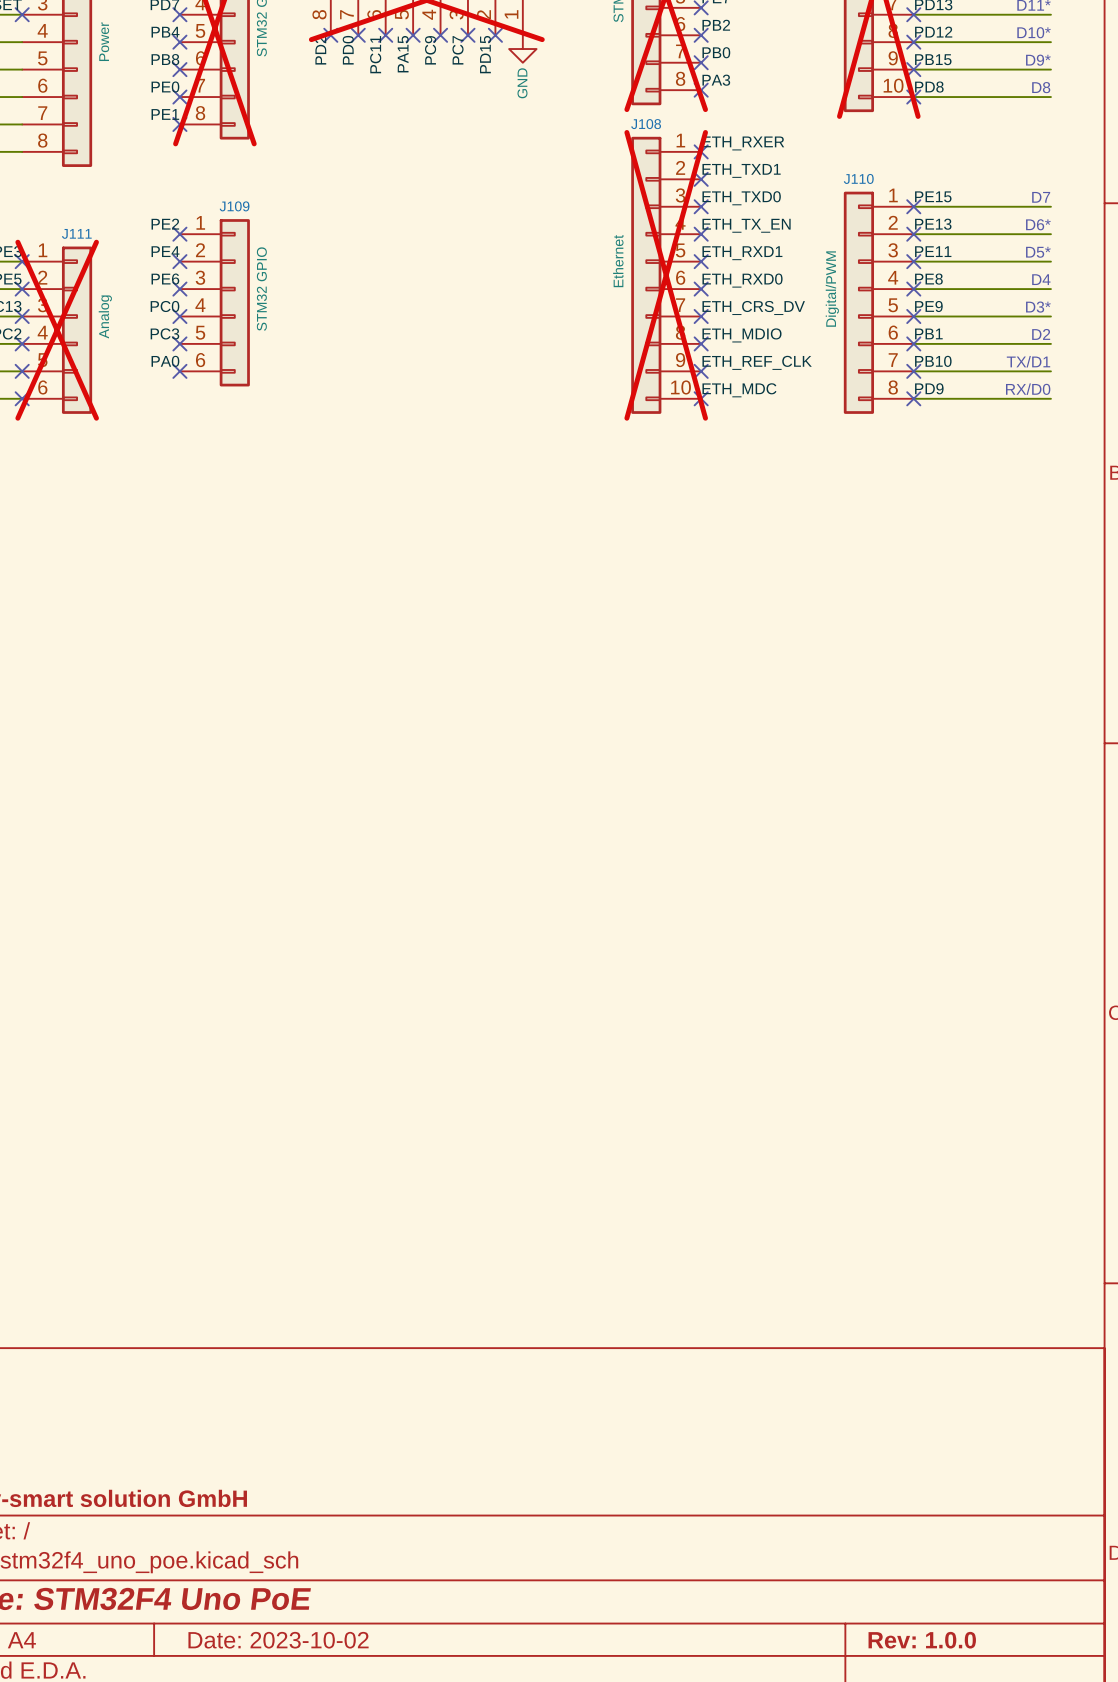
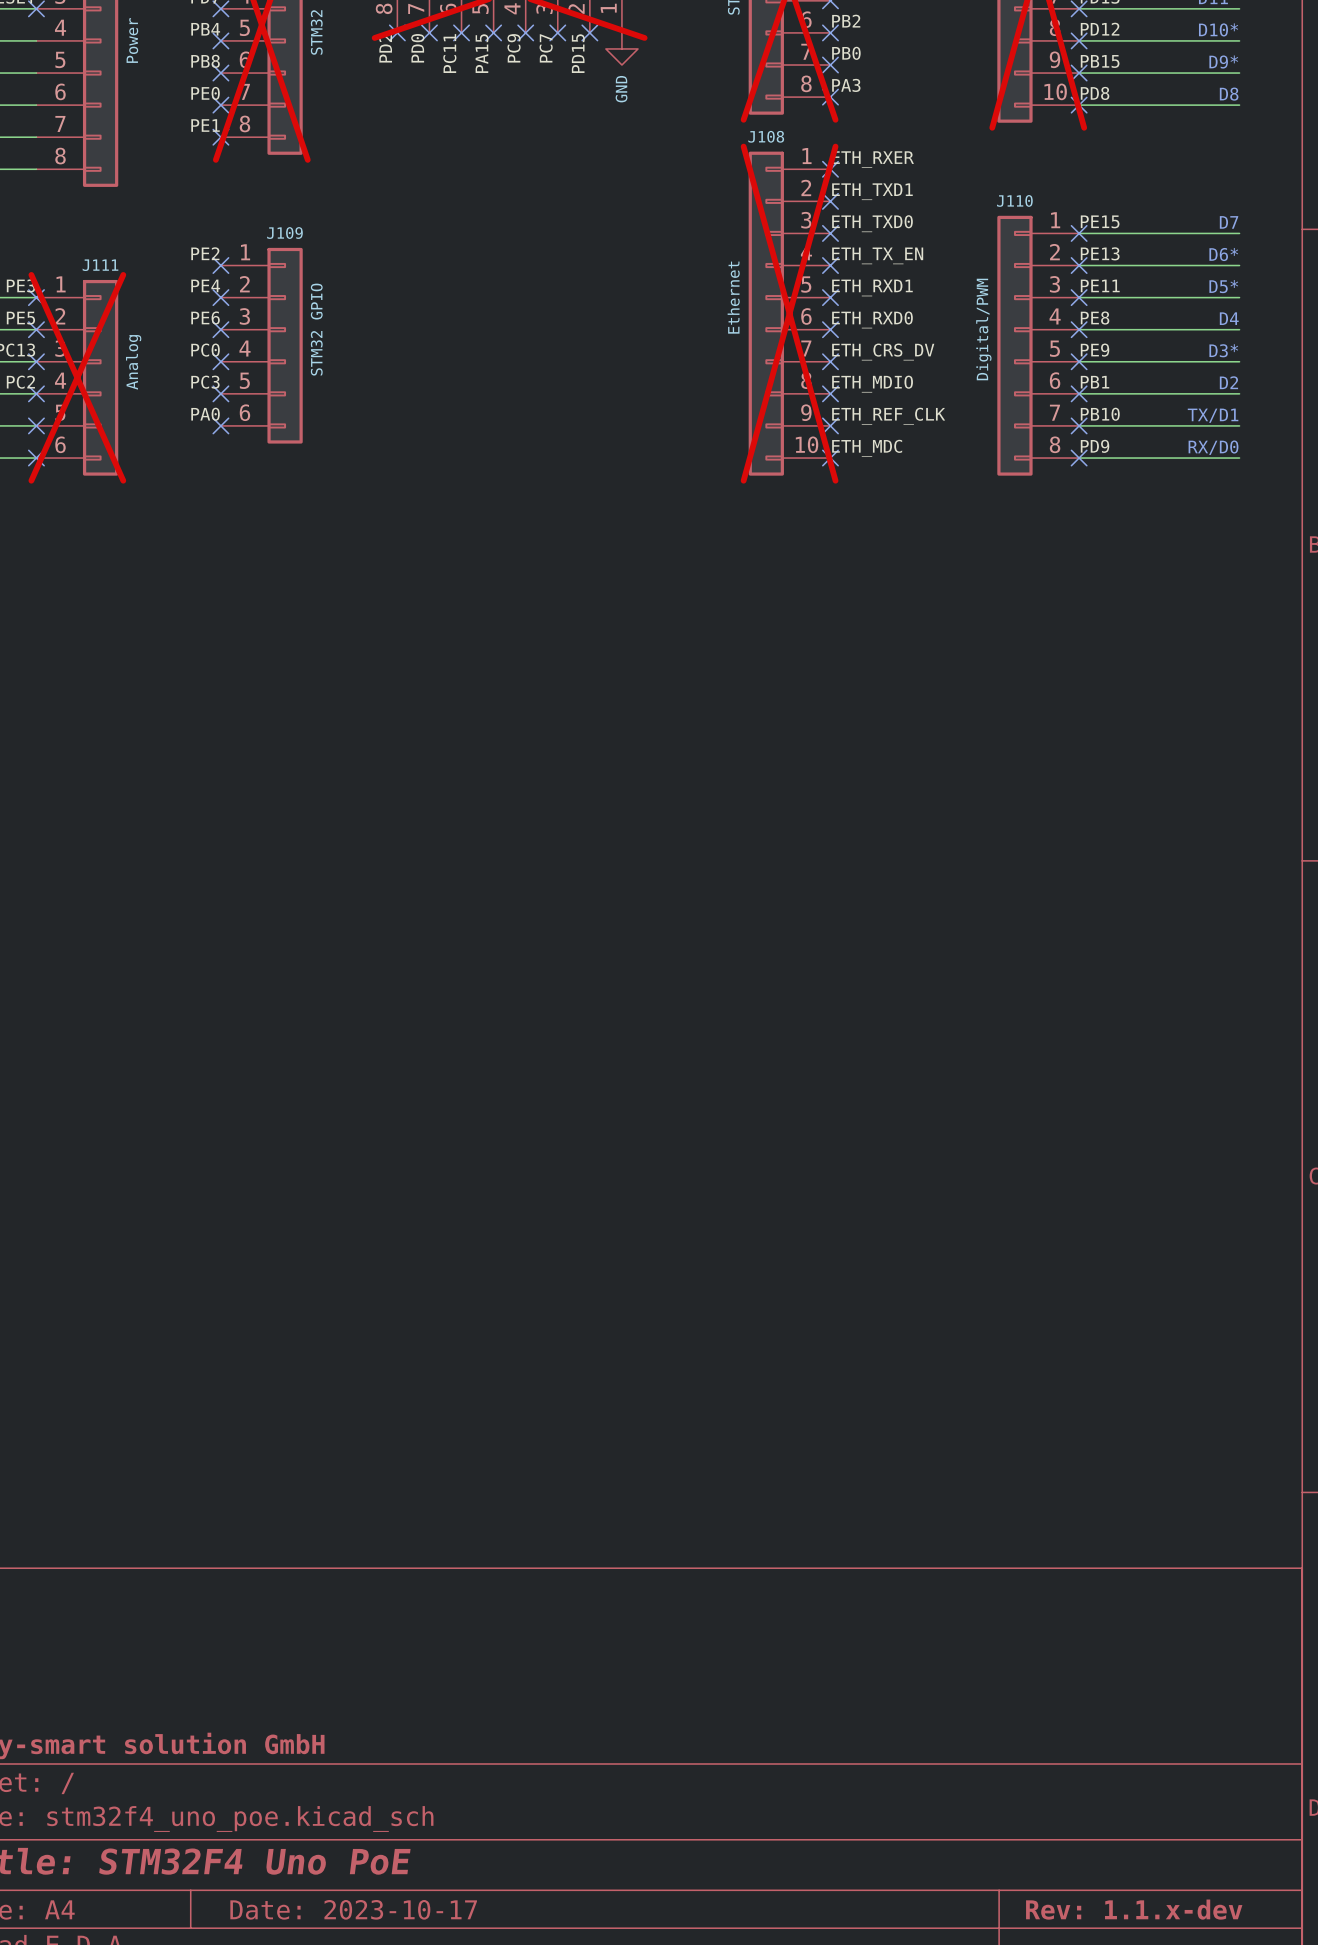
title block: Date: 2023-10-02 (278, 1640) -> Date: 2023-10-17 (353, 1909)
title block: Rev: 1.0.0 (922, 1640) -> Rev: 1.1.x-dev (1134, 1909)

